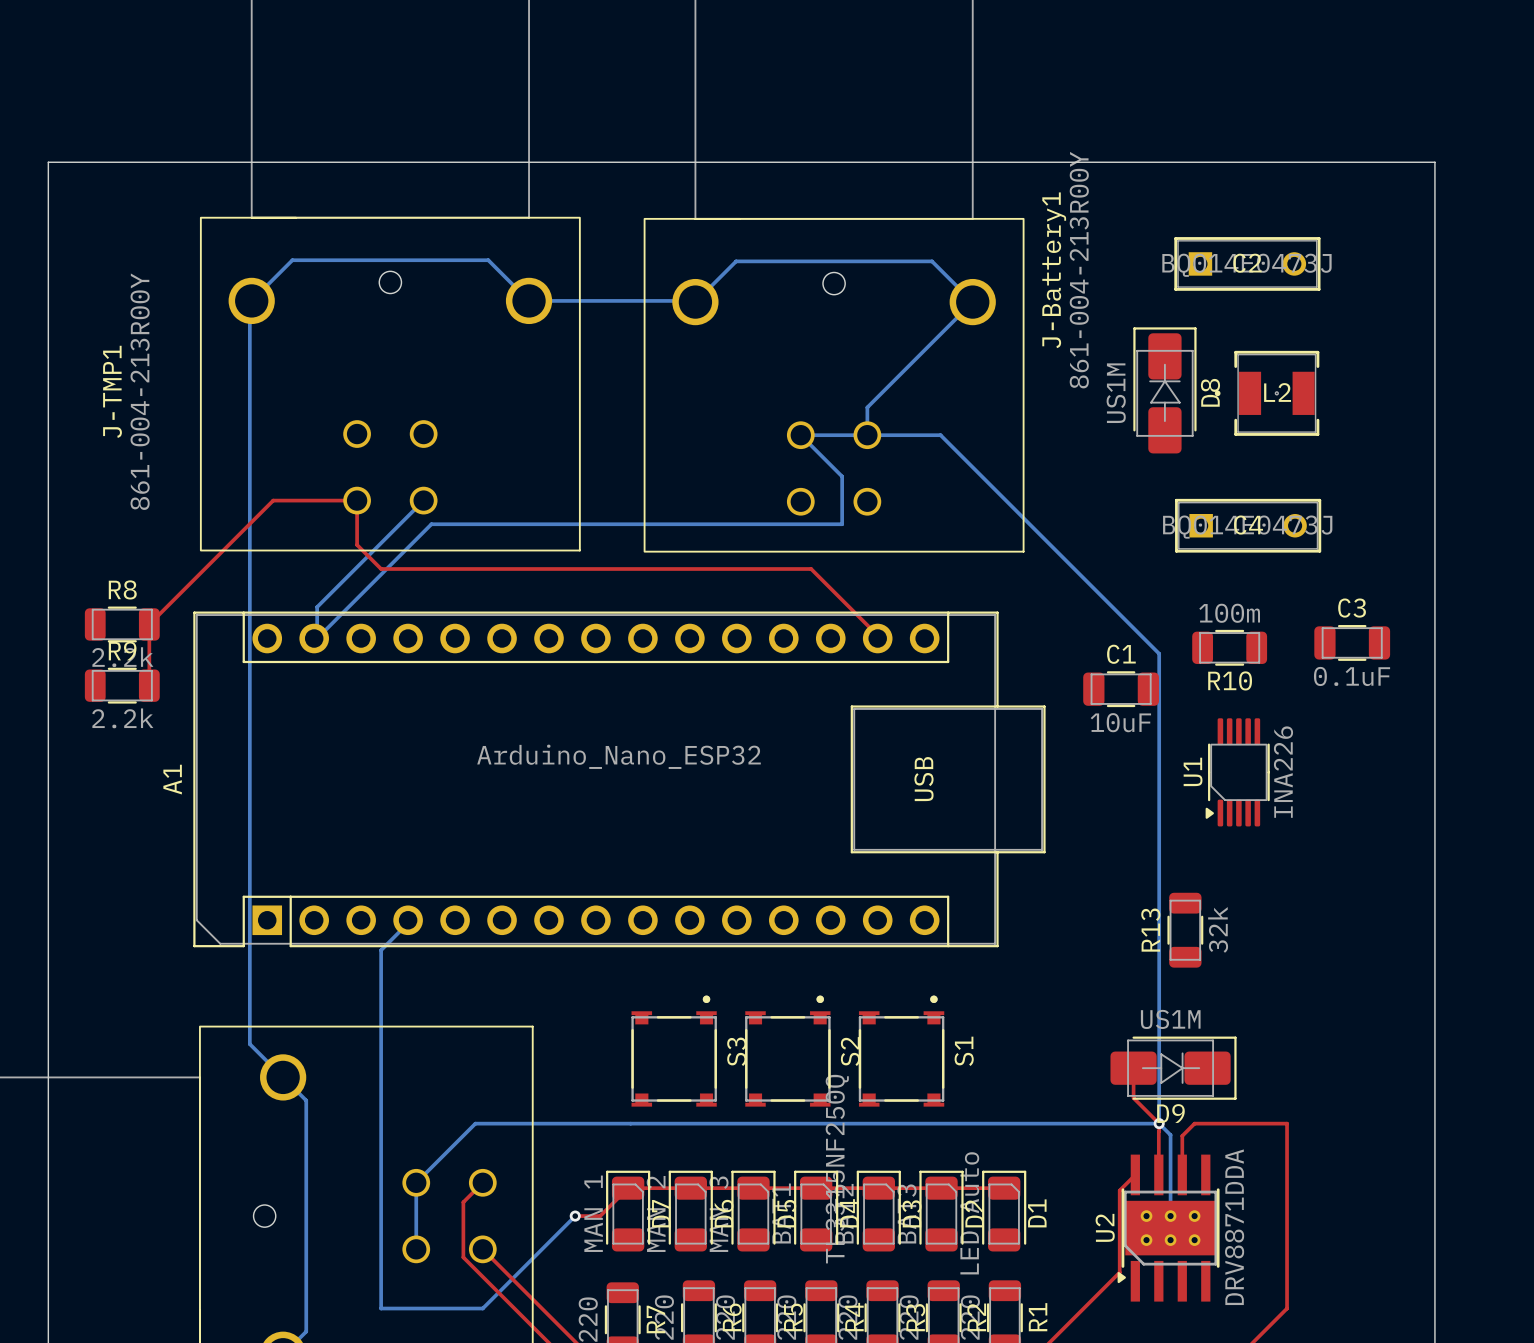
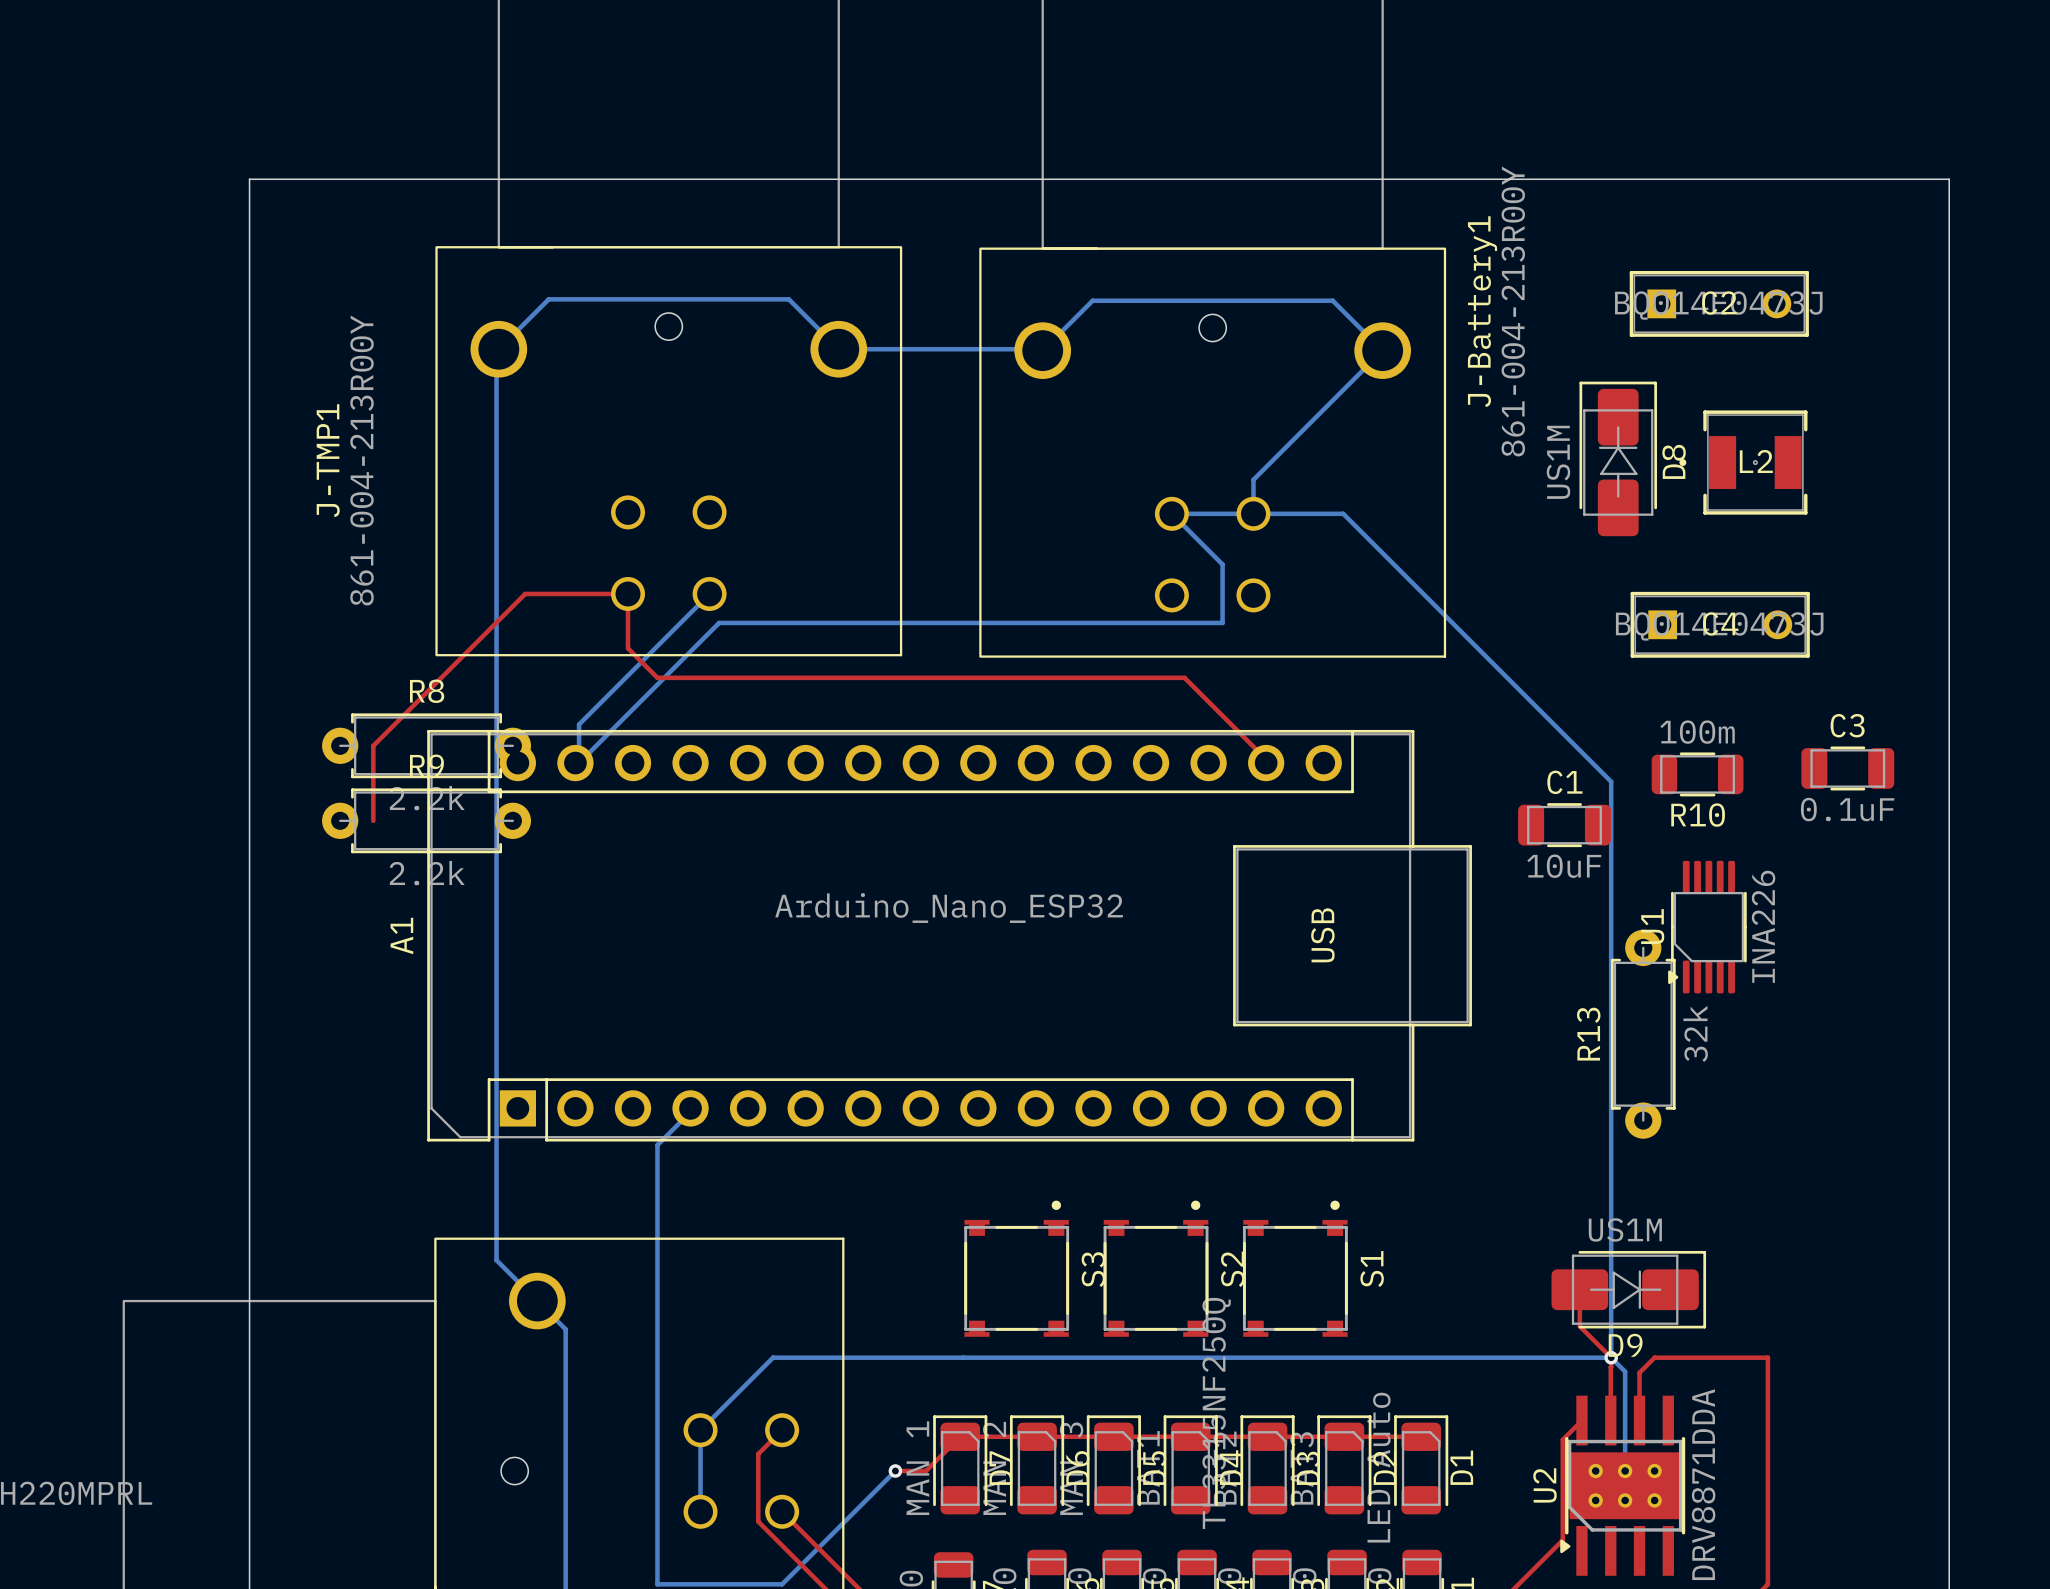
R8 footprint: [84, 606, 160, 643] -> [322, 713, 532, 779]
R9 footprint: [84, 667, 160, 704] -> [322, 788, 532, 854]
R13 footprint: [1167, 892, 1204, 968] -> [1610, 929, 1676, 1139]

